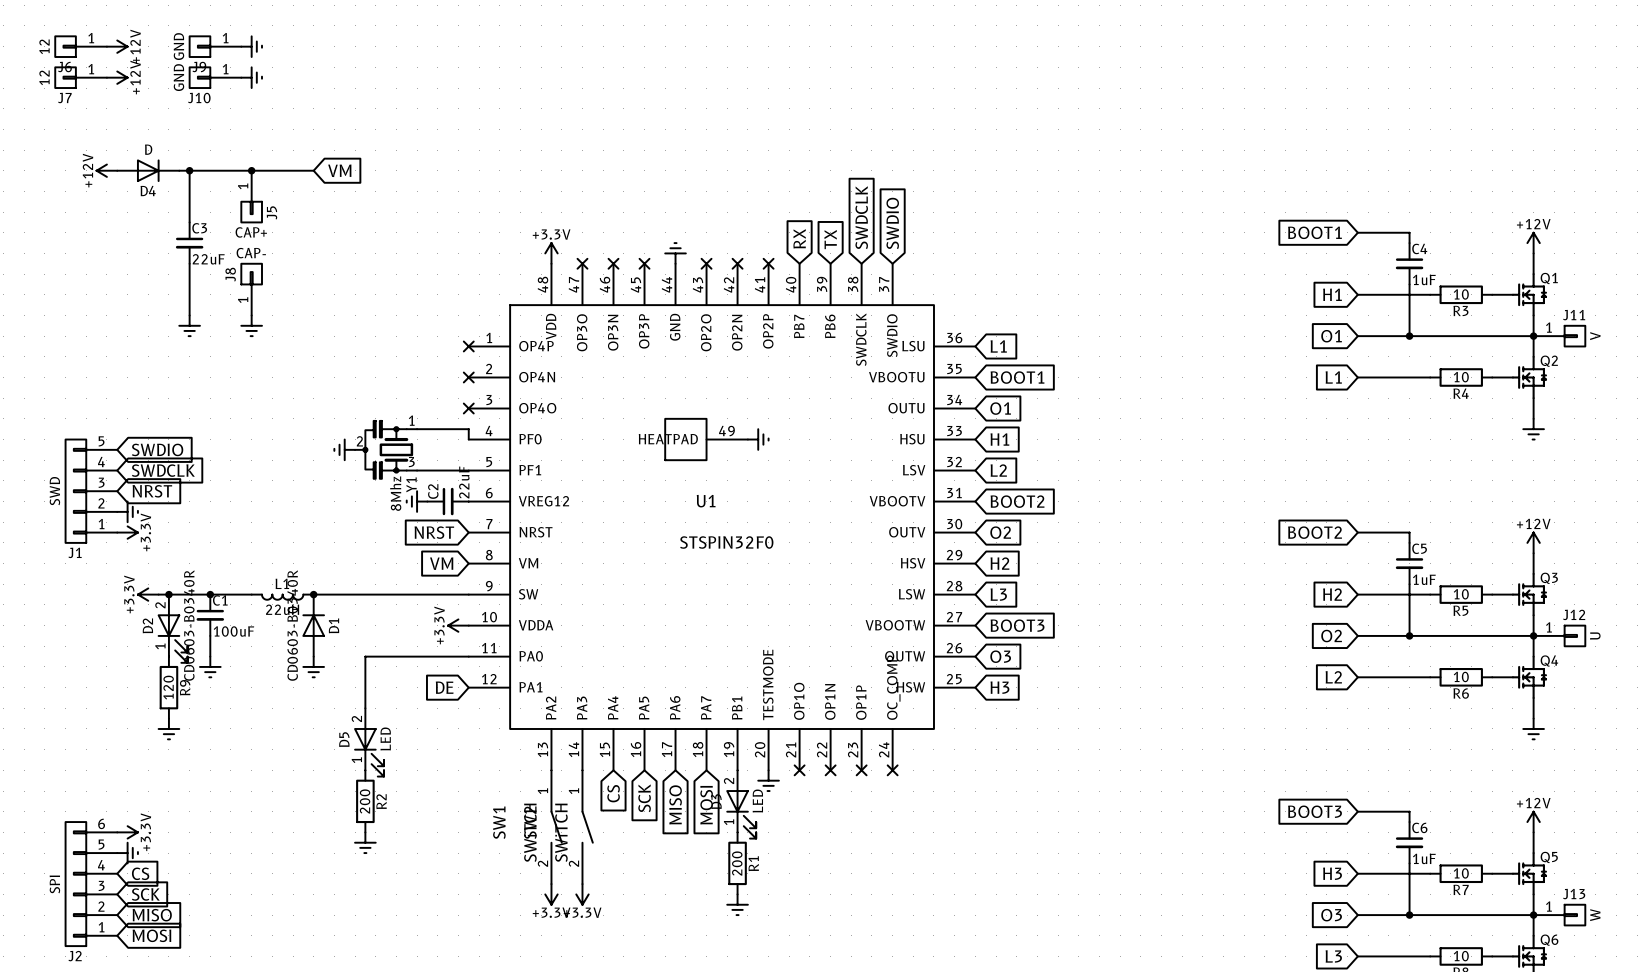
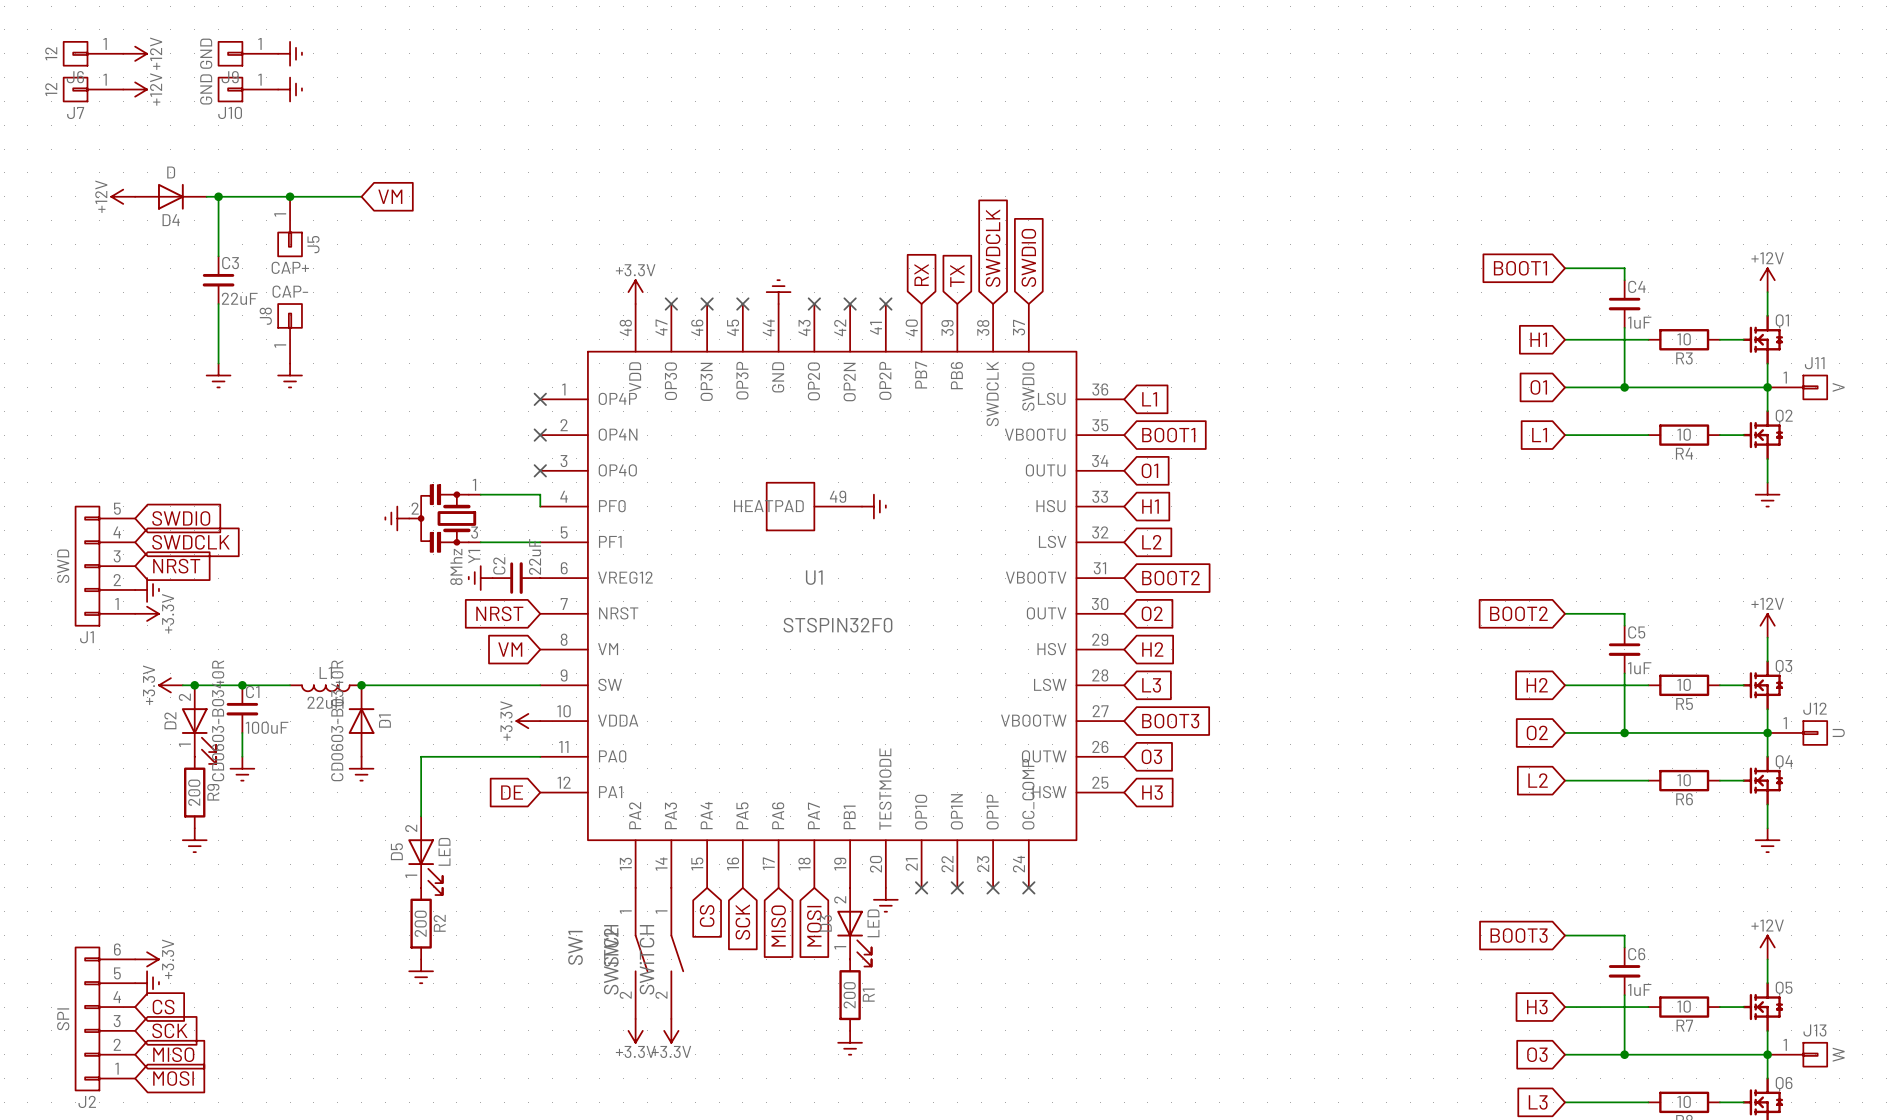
R9 value: 120 (168, 687) -> 200 (194, 792)

